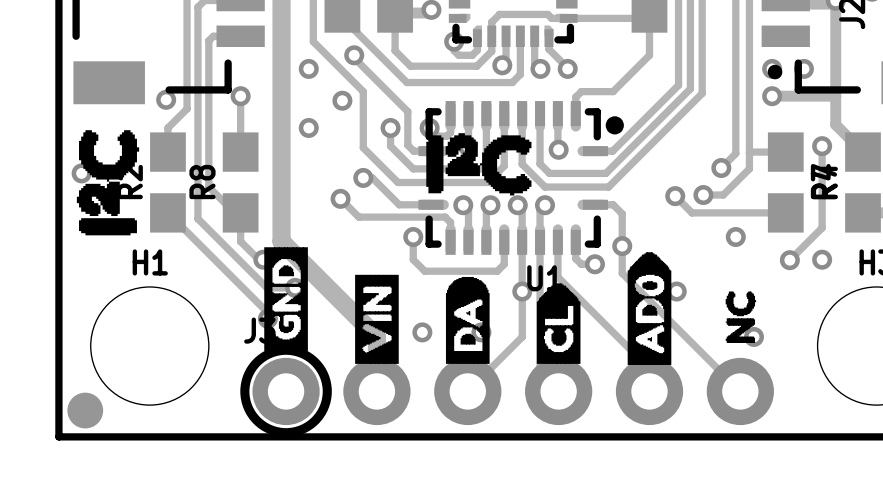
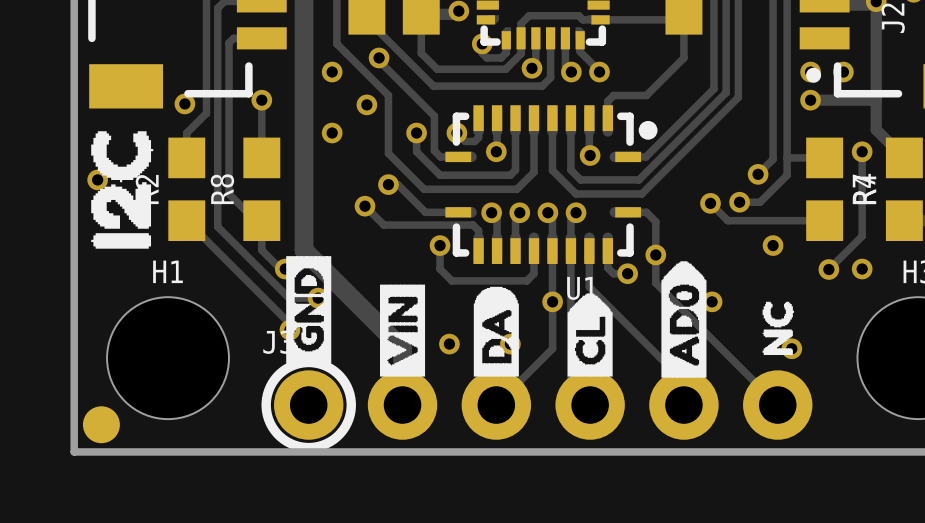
drawing shape: [76, 130, 140, 236] -> [91, 131, 154, 249]
drawing: [426, 133, 532, 196] -> none

